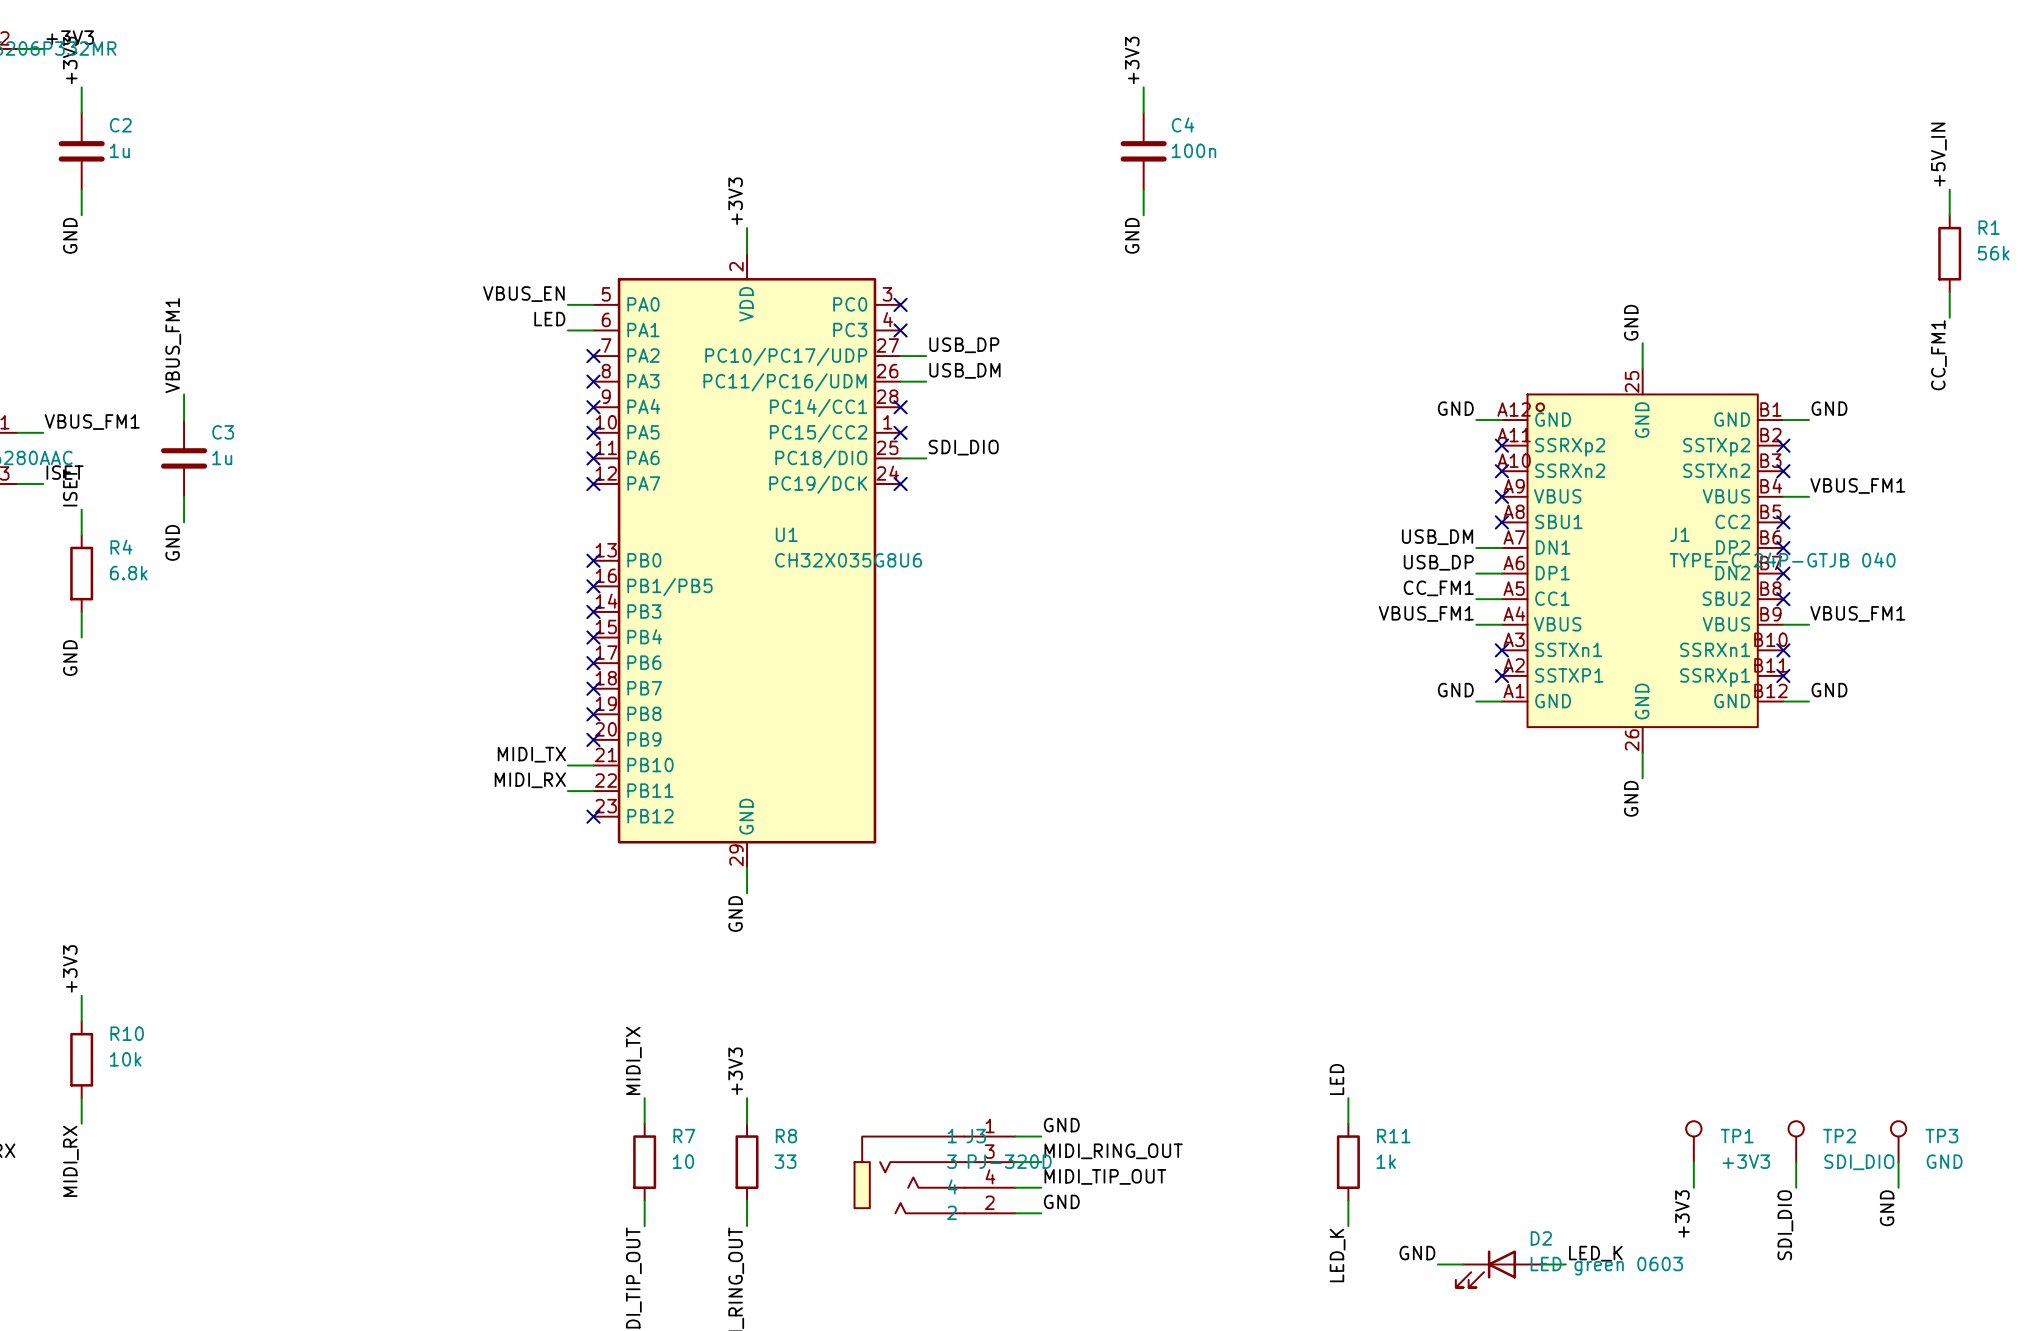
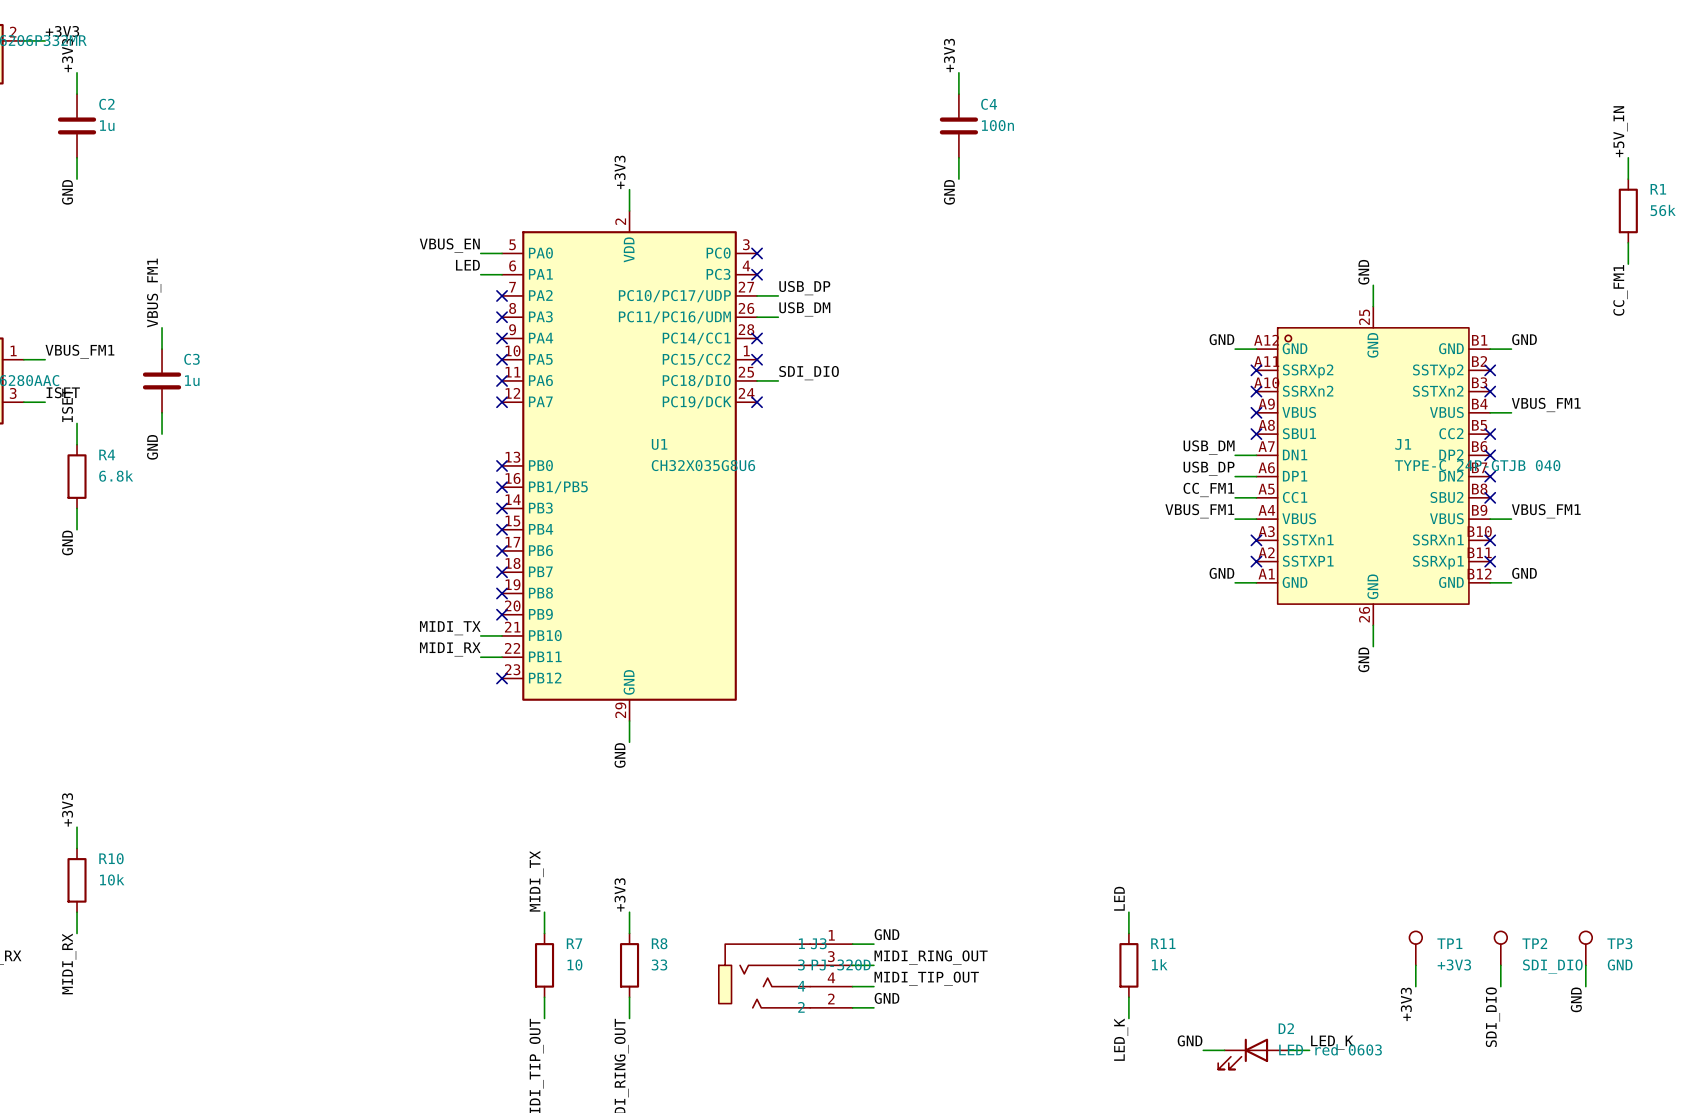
D2 value: LED green 0603 (1606, 1266) -> LED red 0603 (1330, 1049)

